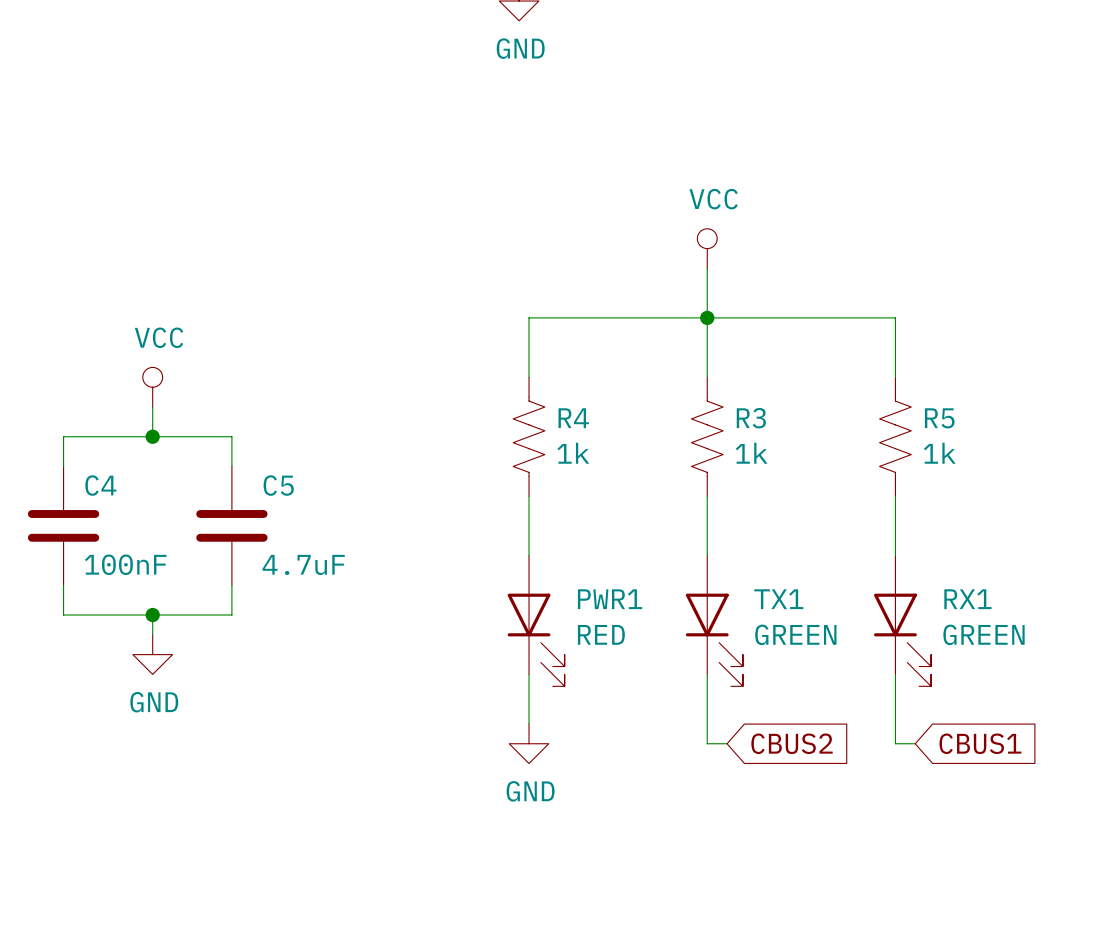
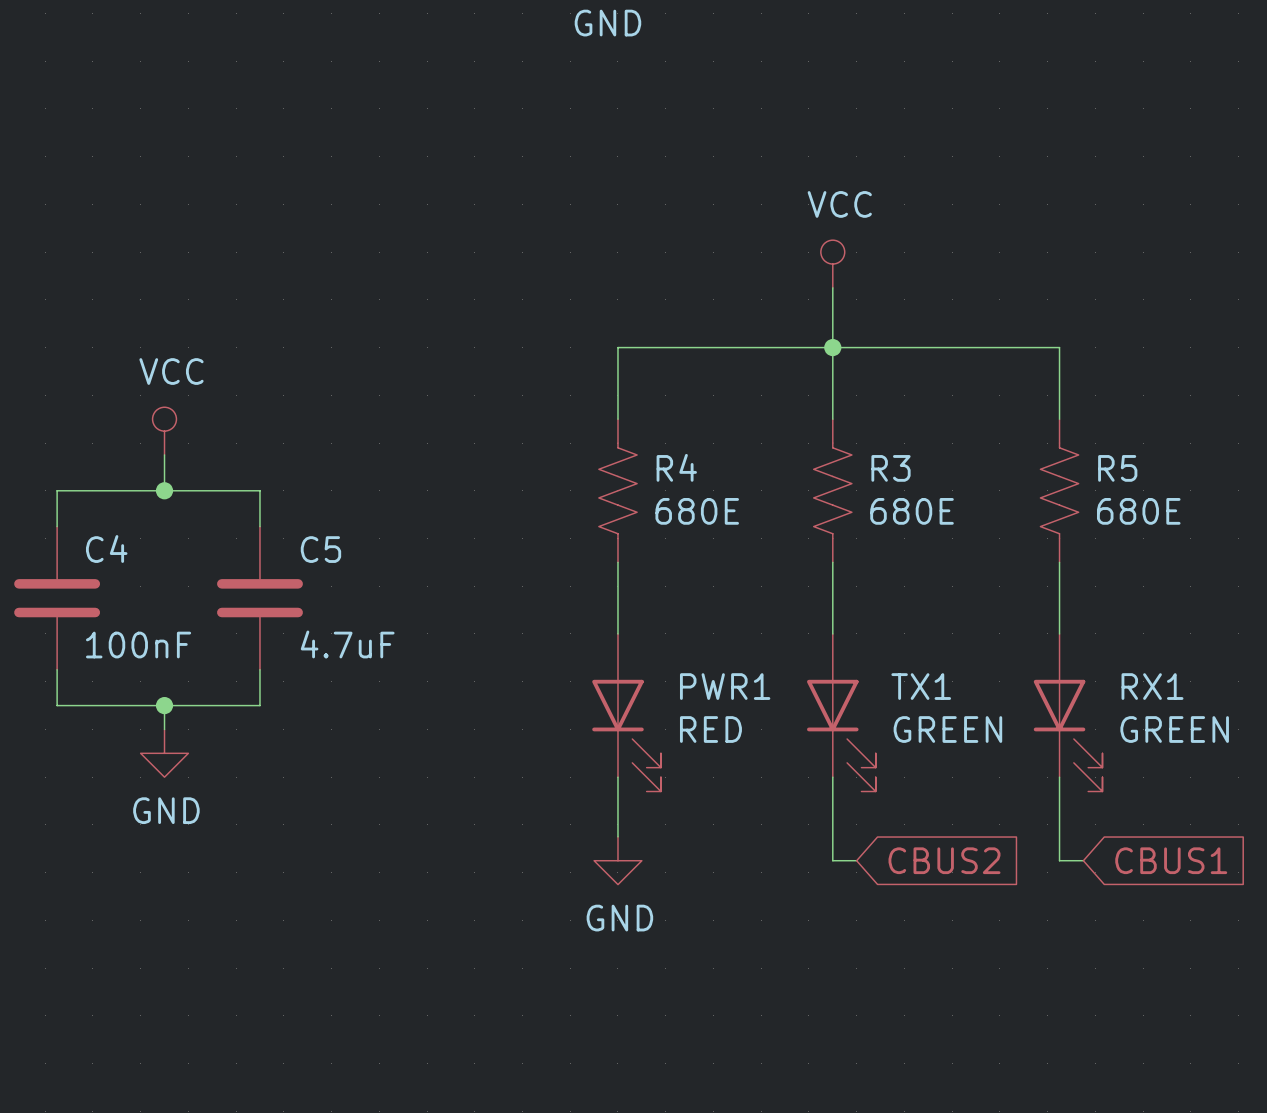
R4 value: 1k (573, 453) -> 680E (697, 511)
R3 value: 1k (751, 453) -> 680E (912, 511)
R5 value: 1k (939, 453) -> 680E (1138, 511)

